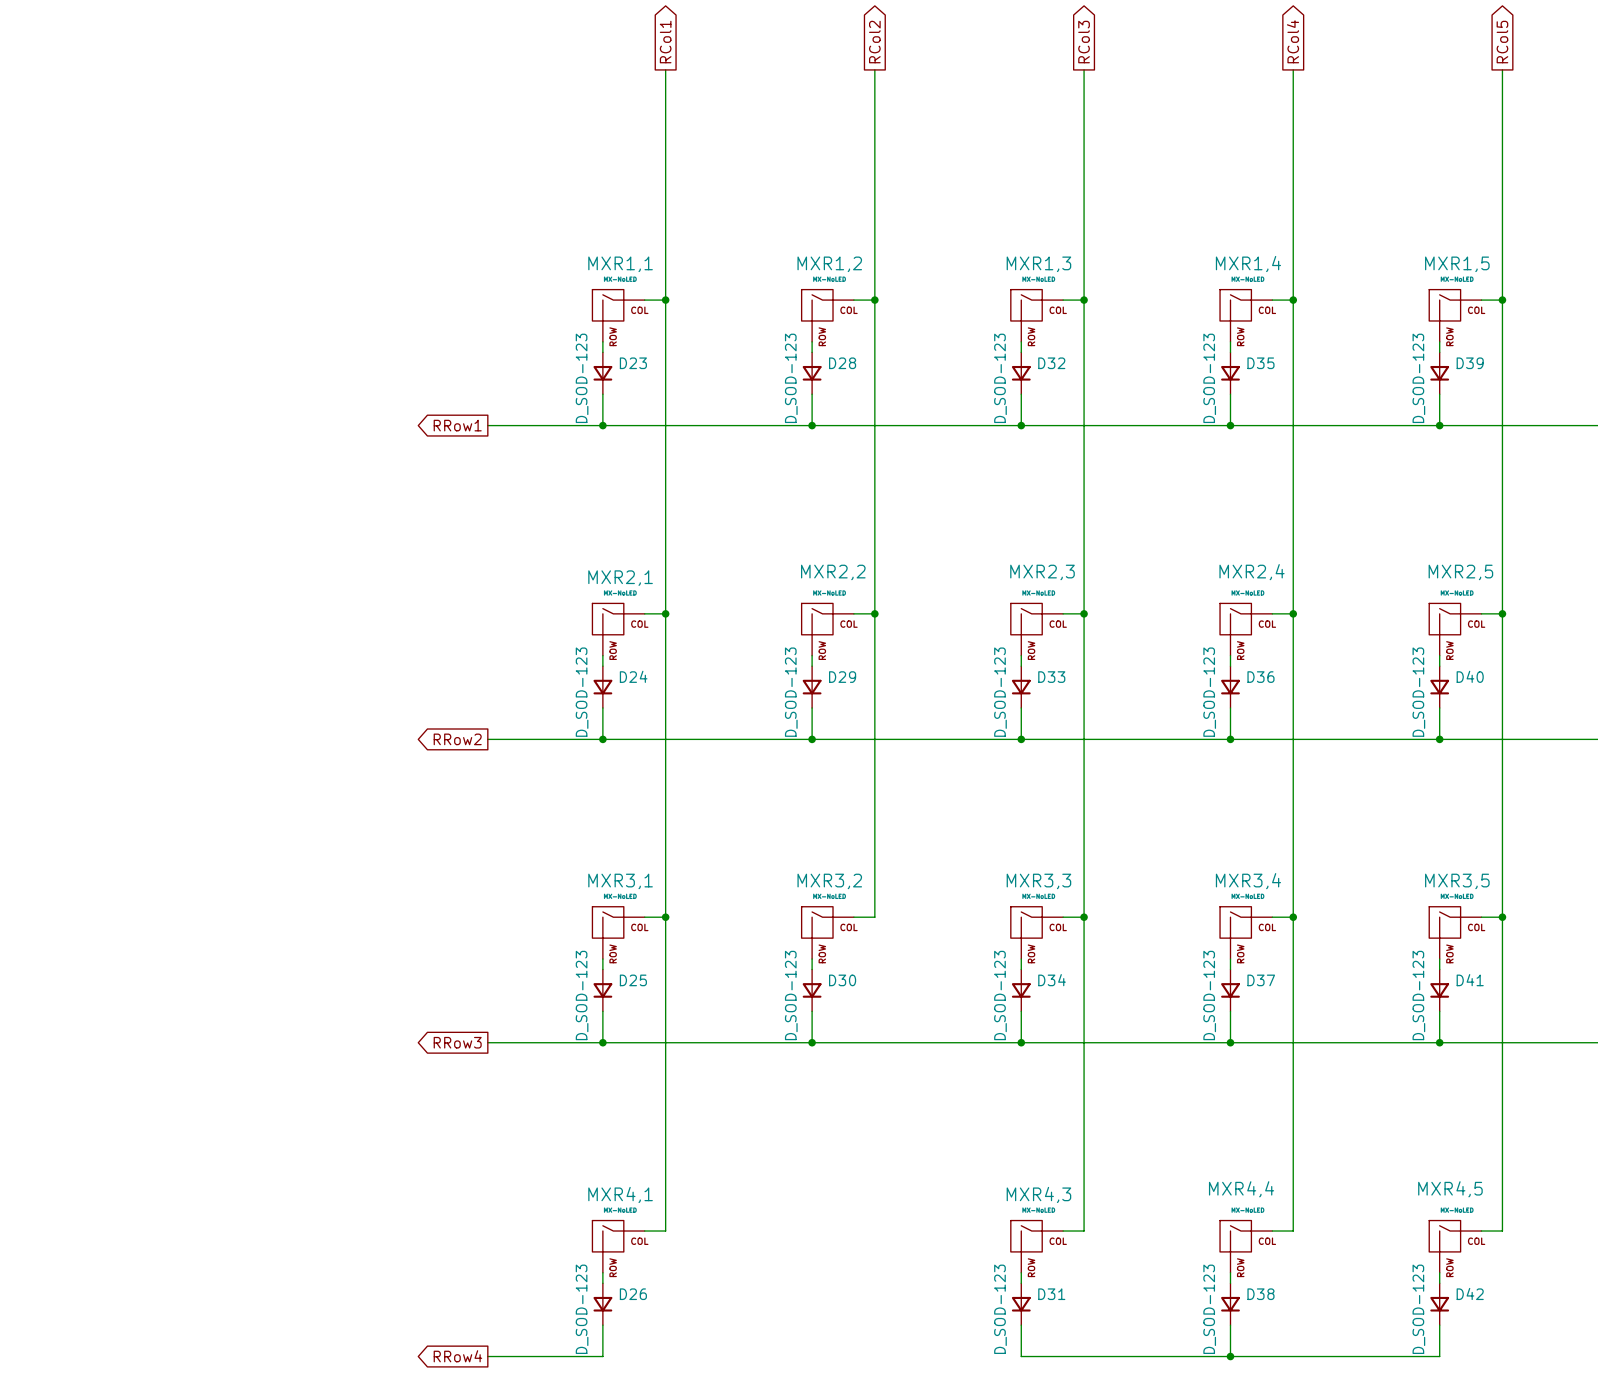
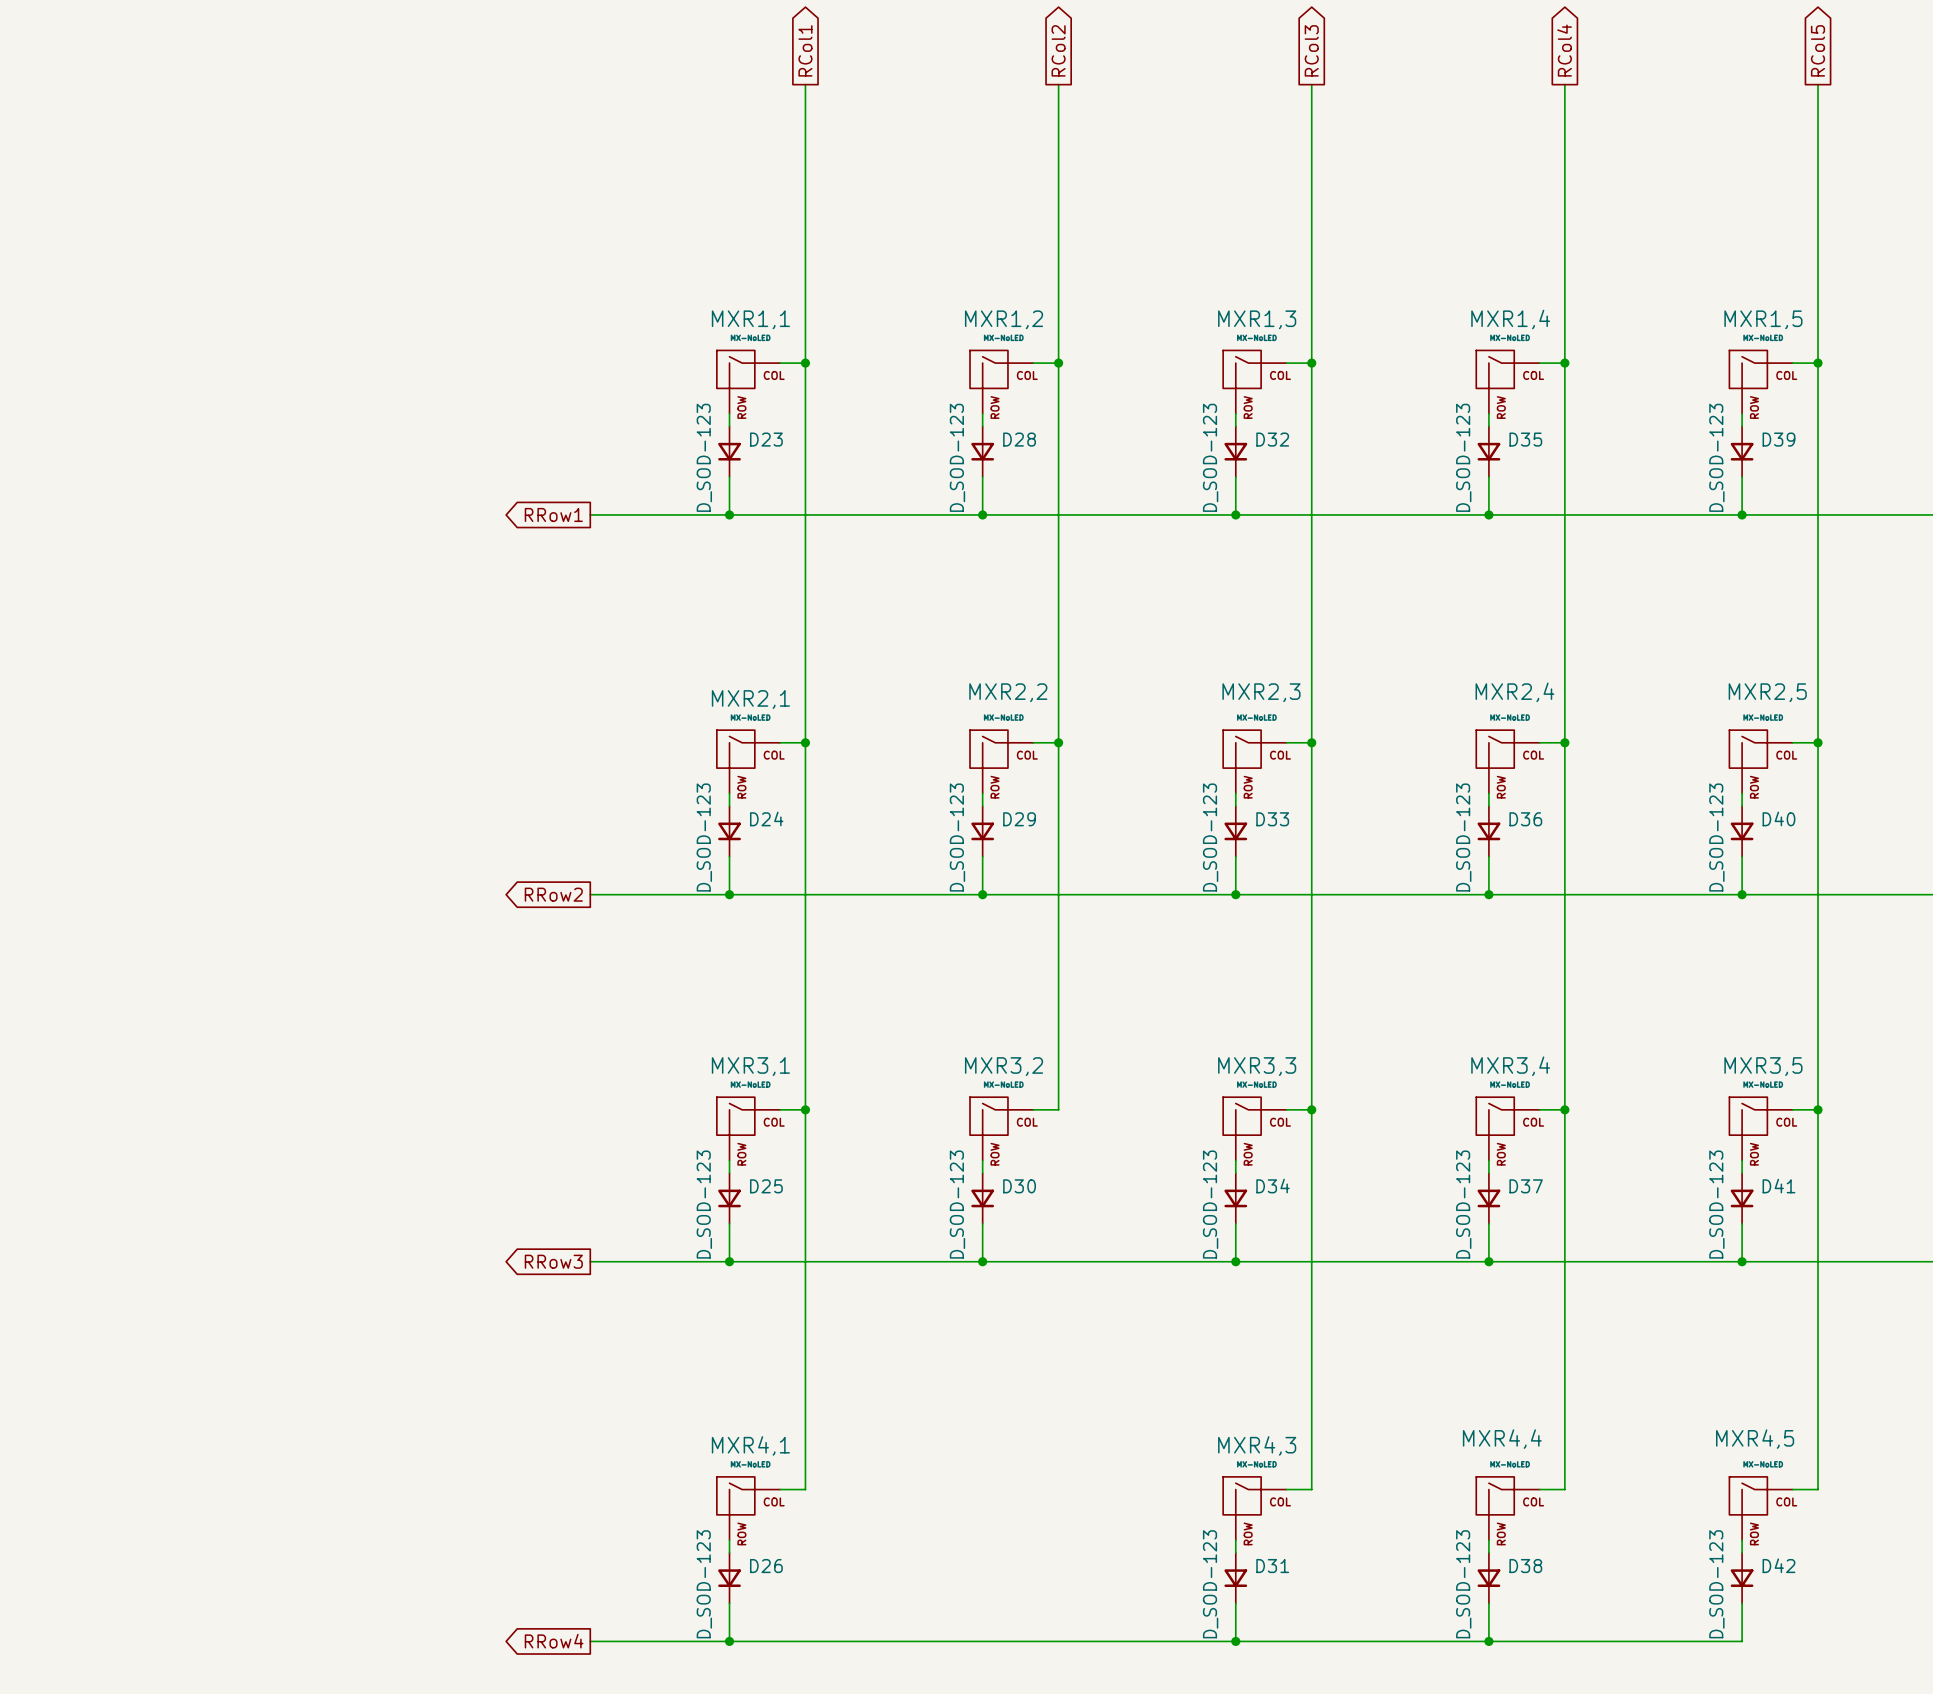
wire: none -> (729, 1641) (1235, 1641)
junction: none -> (729, 1641)
junction: none -> (1235, 1641)

